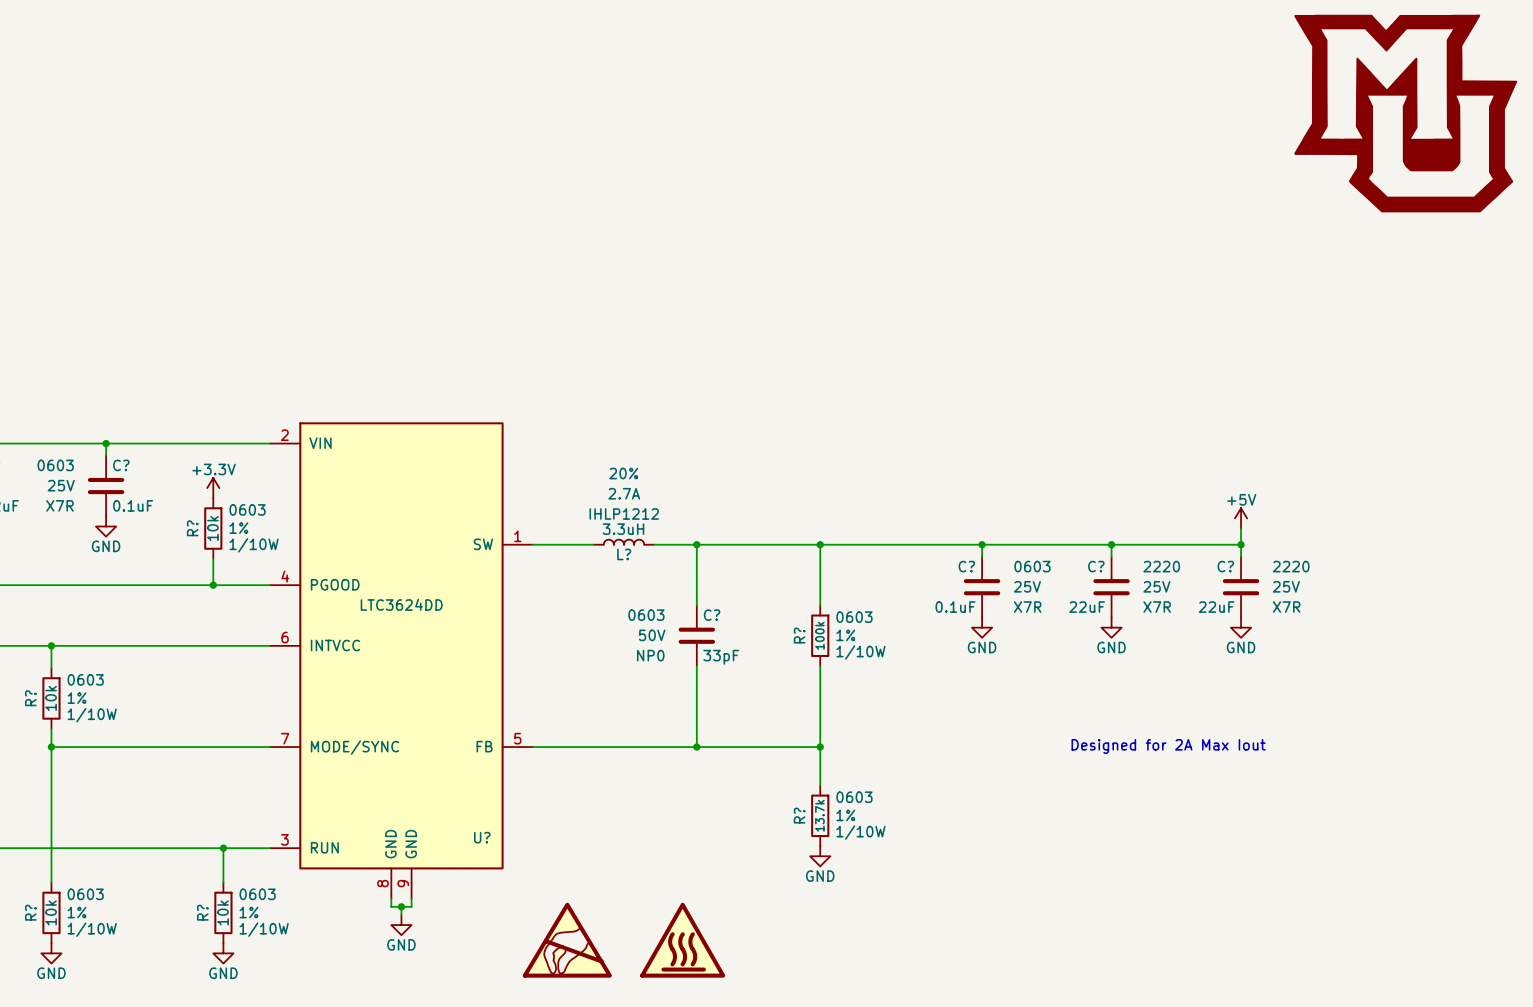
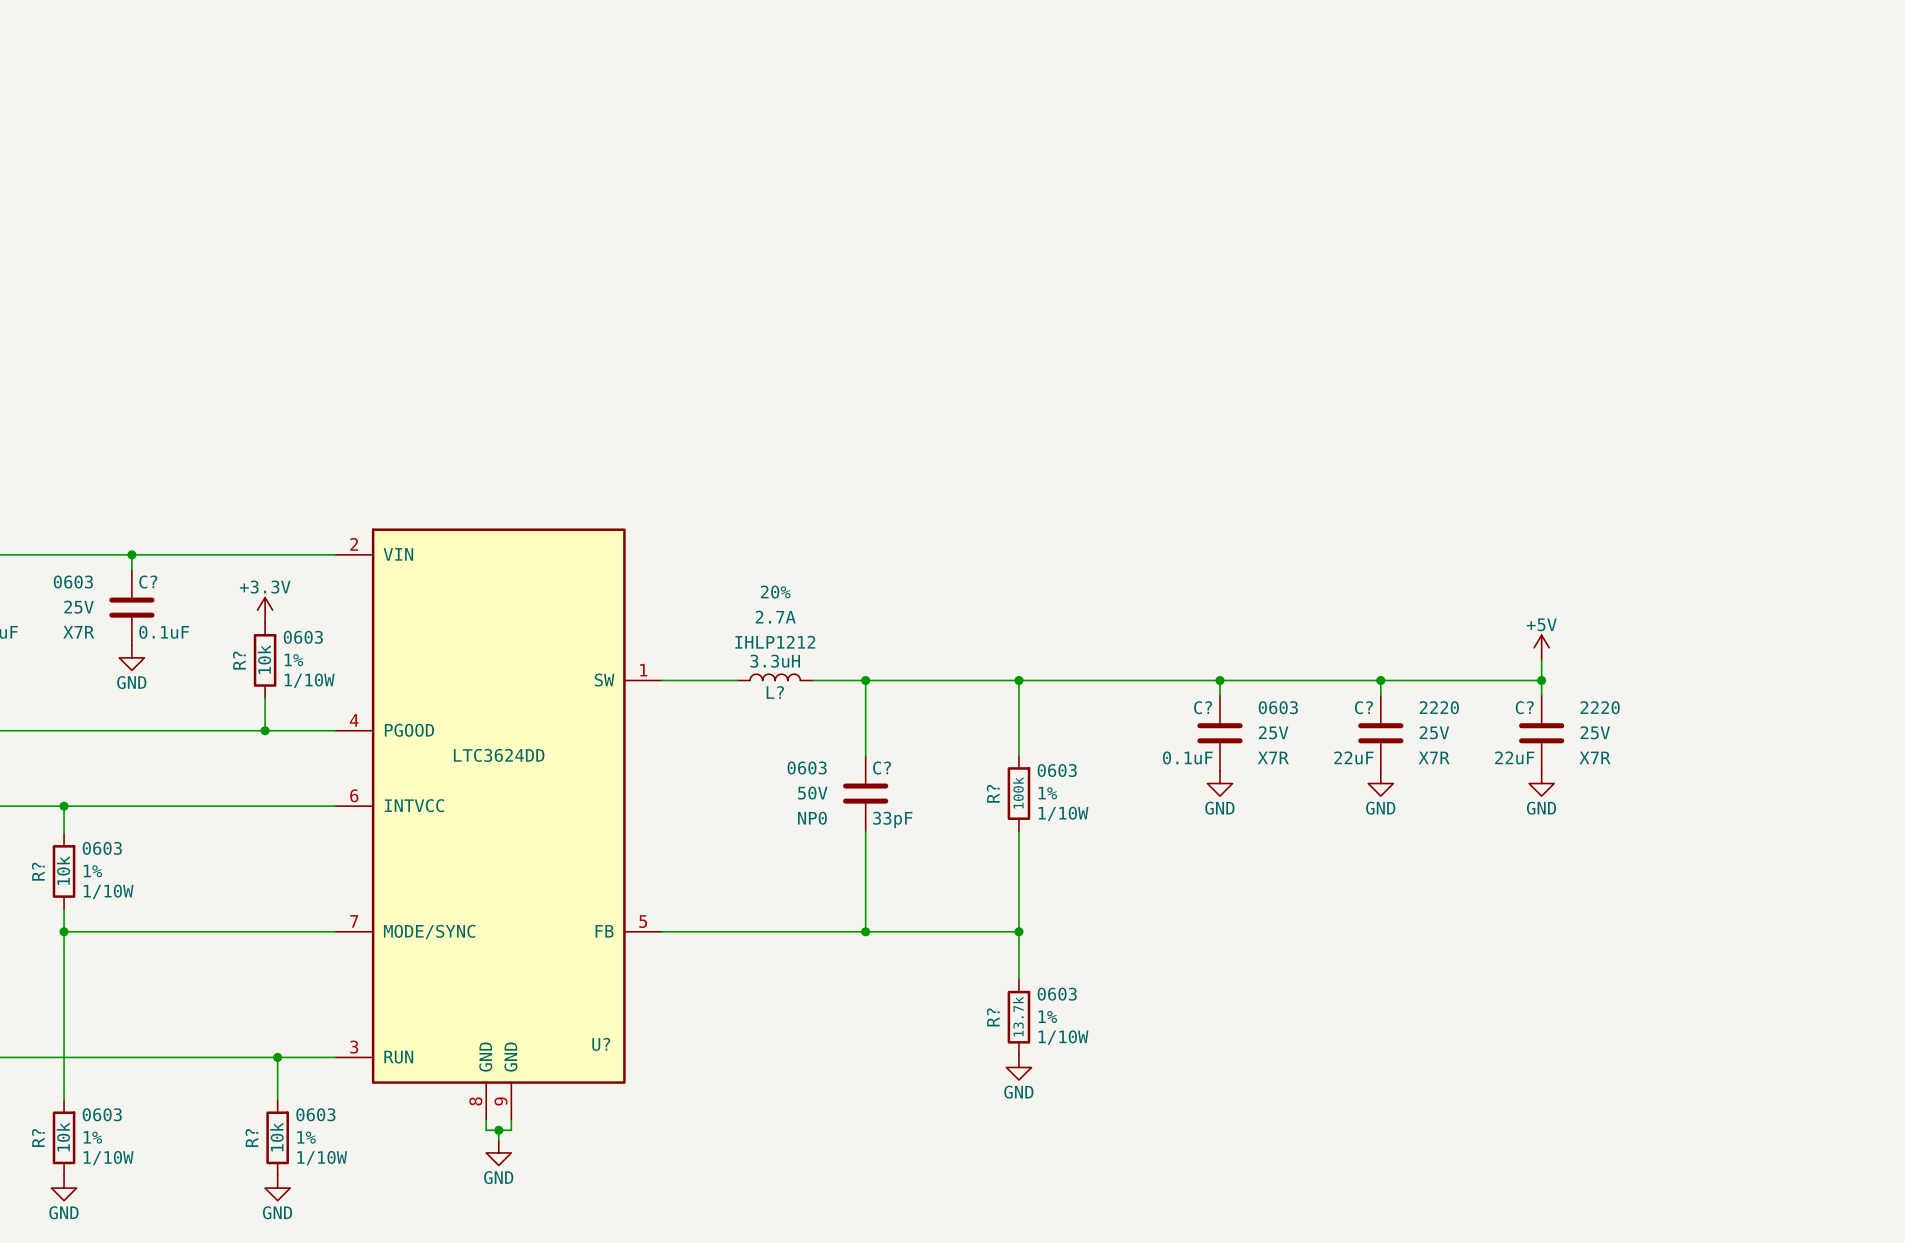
power symbol: (1405, 113) -> none
text: Designed for 2A Max Iout (1168, 746) -> none
power symbol: (567, 940) -> none
power symbol: (682, 940) -> none

